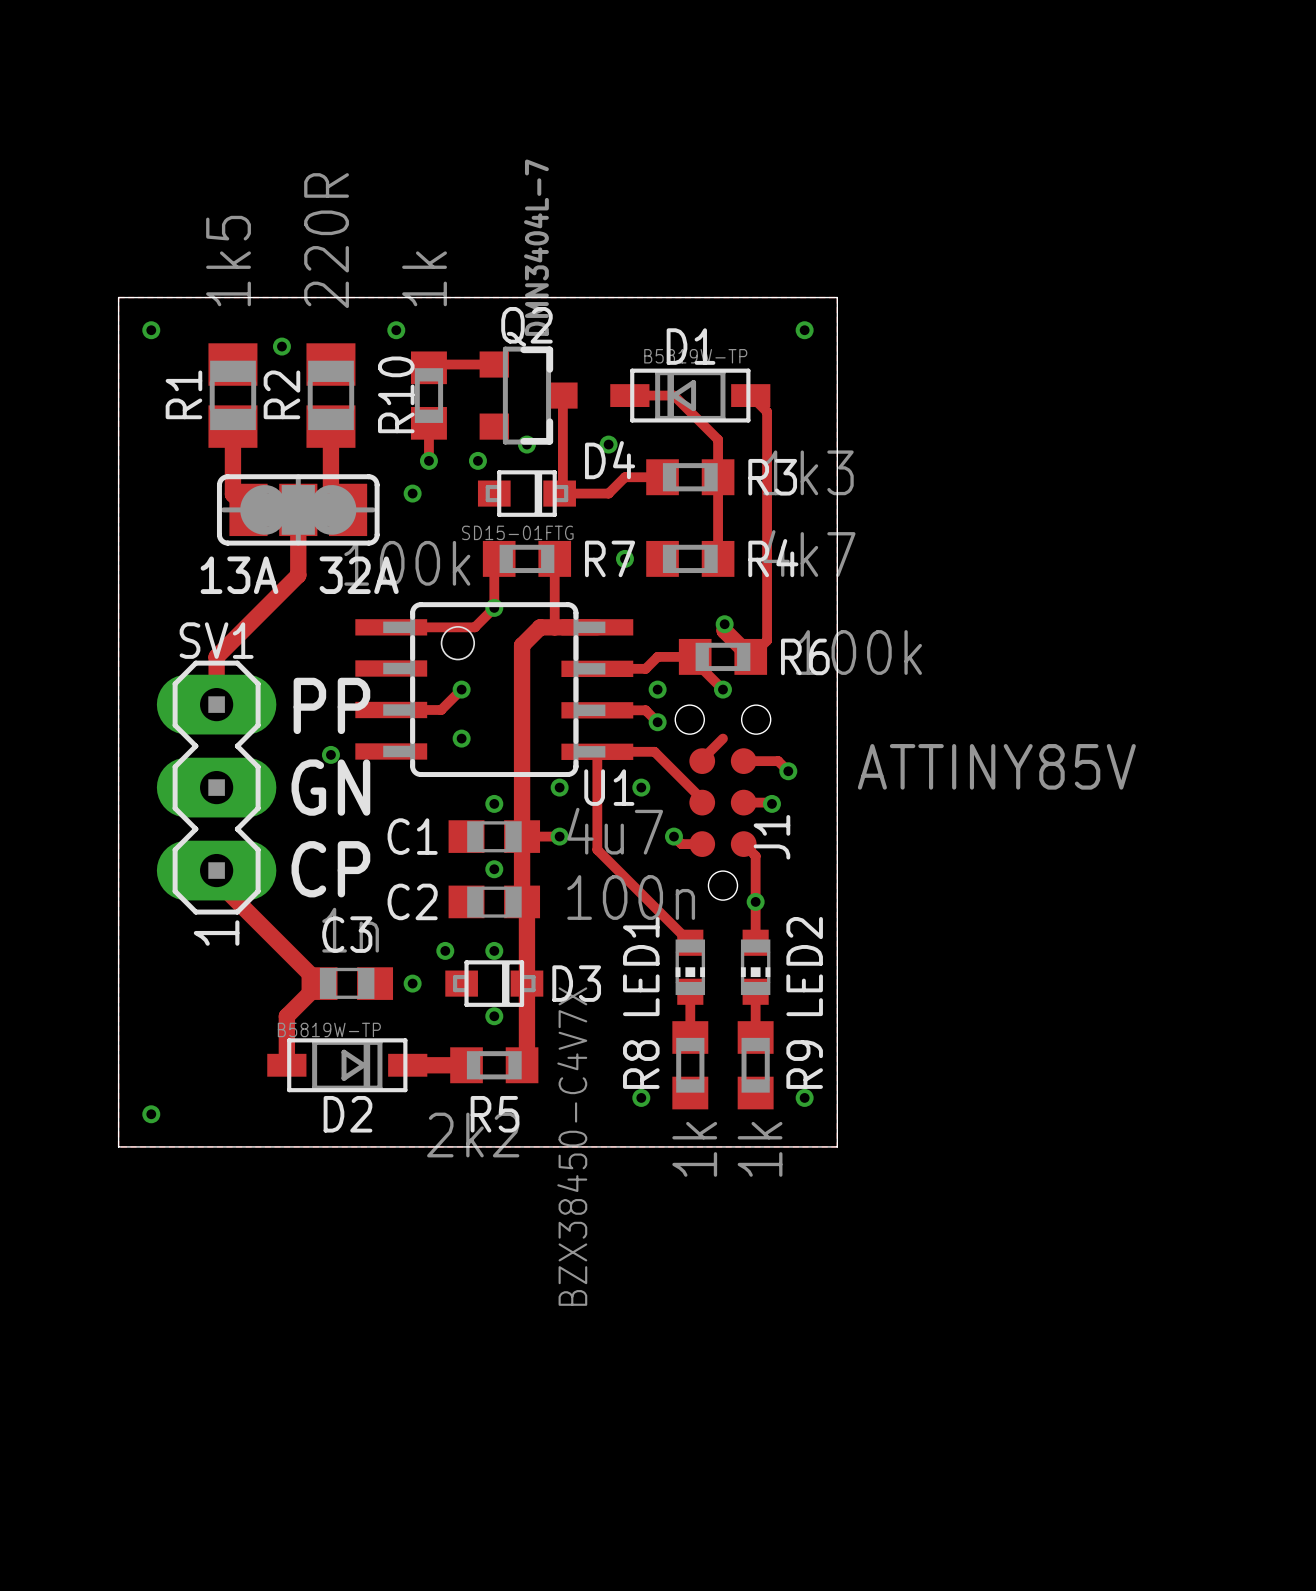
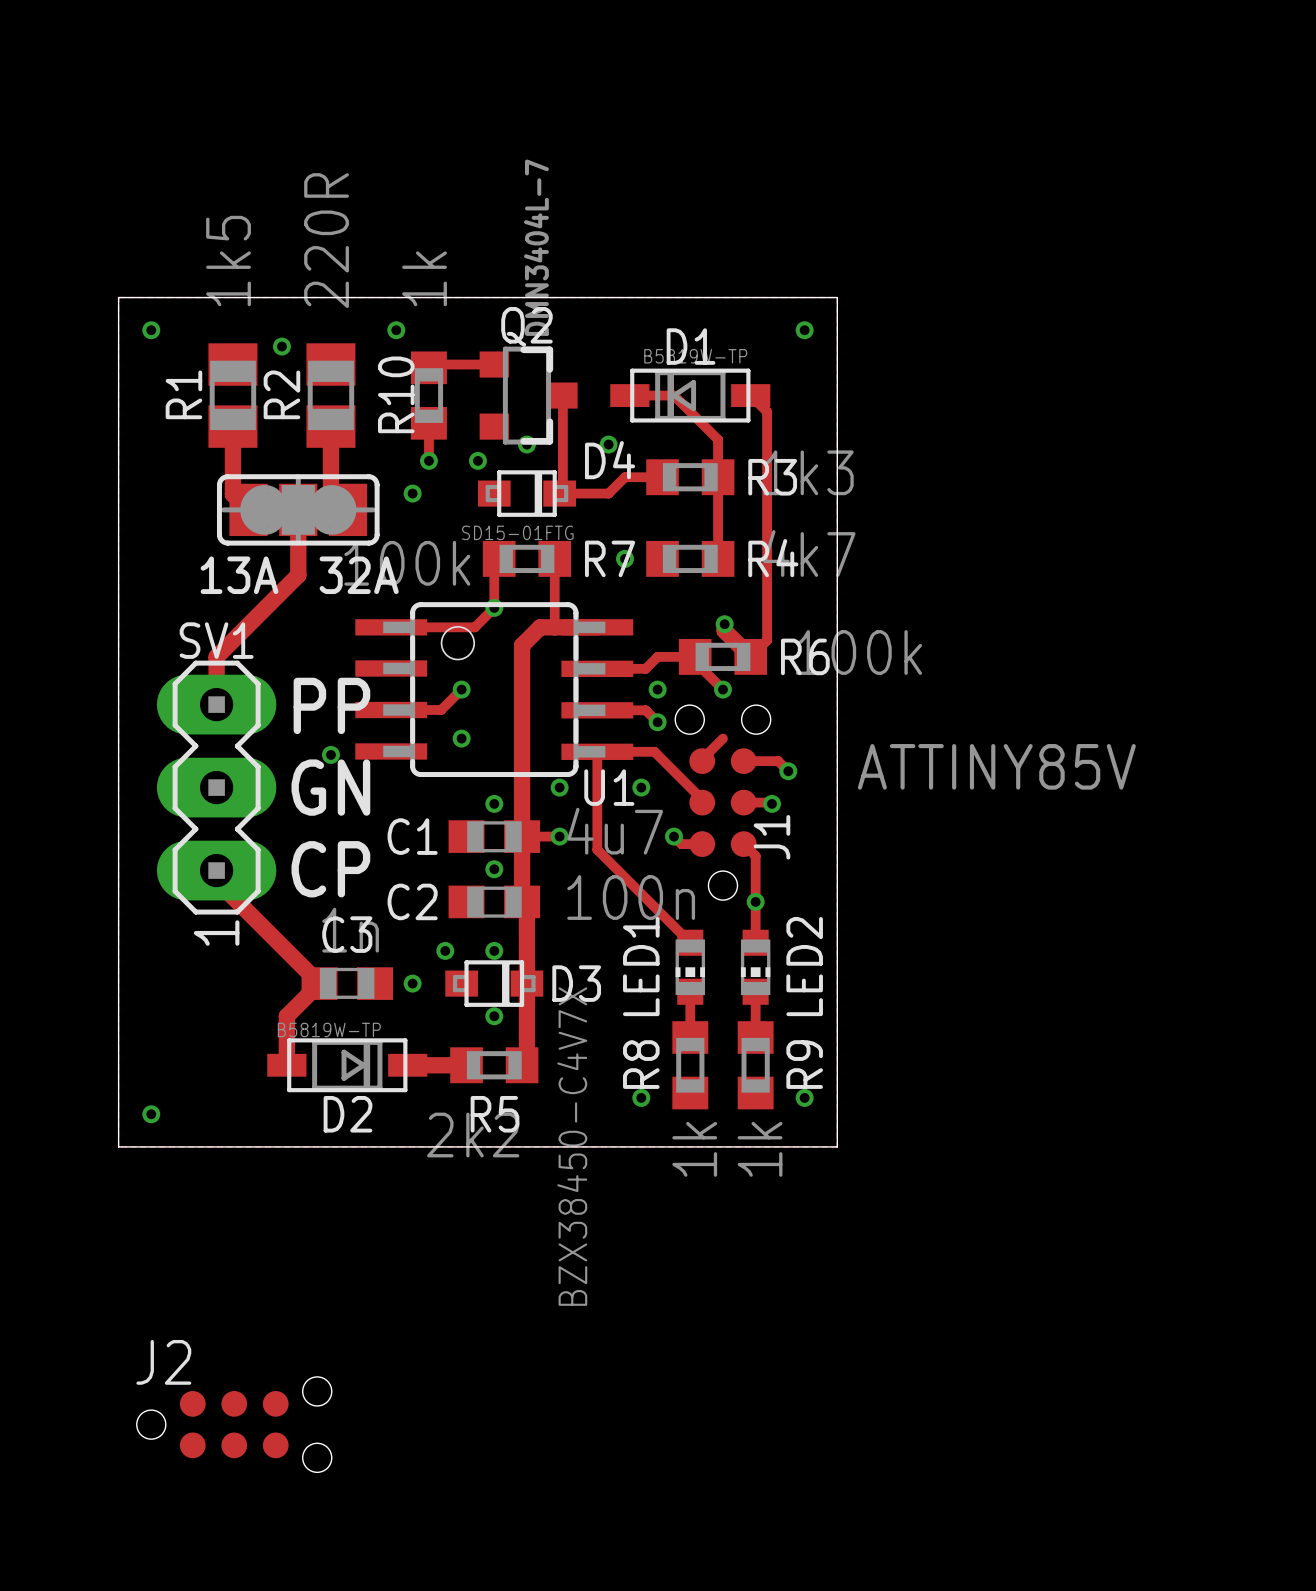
J2: none -> (234, 1424)

